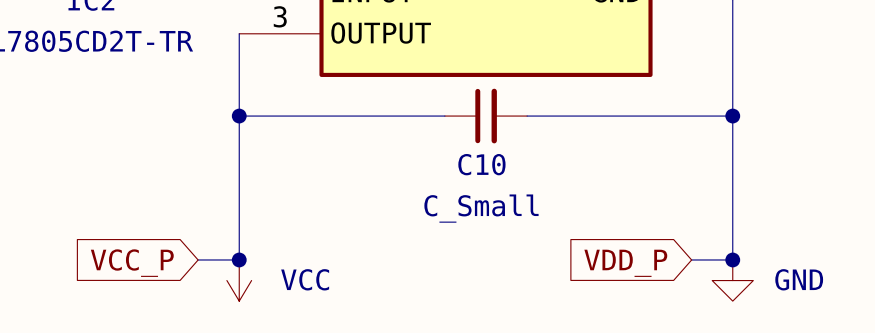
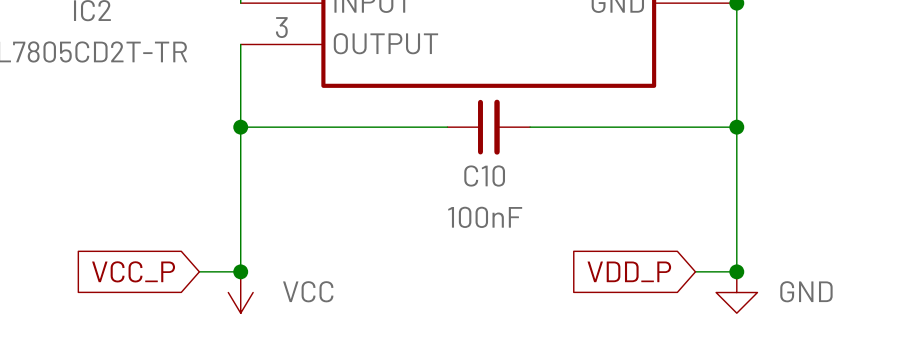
C10 value: C_Small (481, 208) -> 100nF (485, 217)

